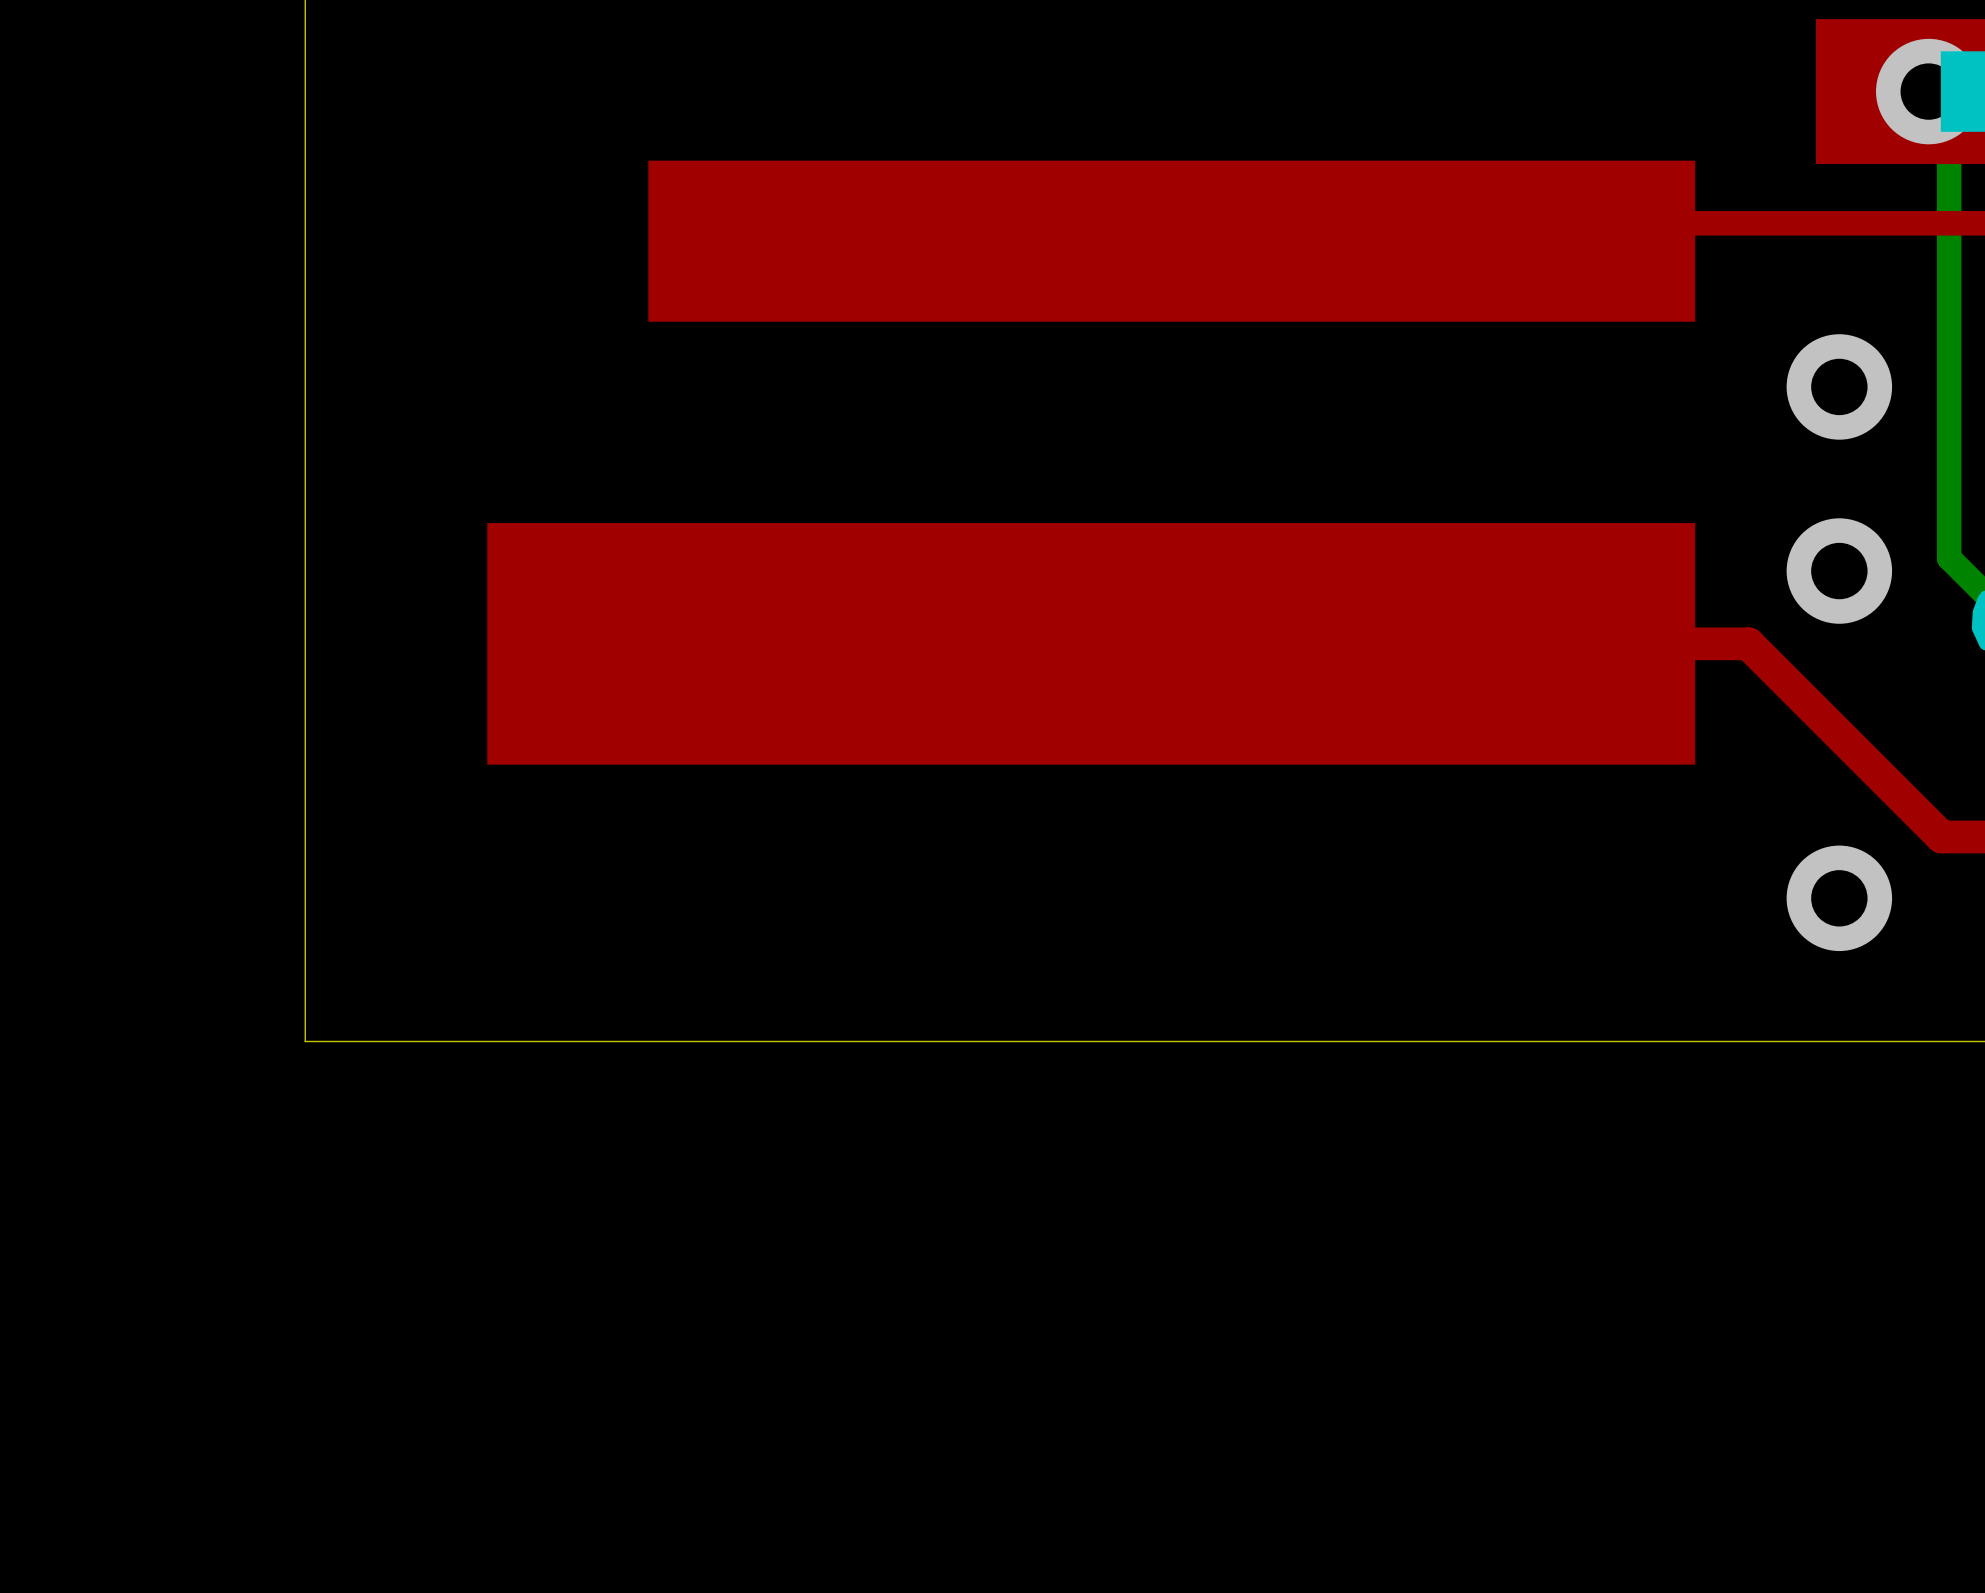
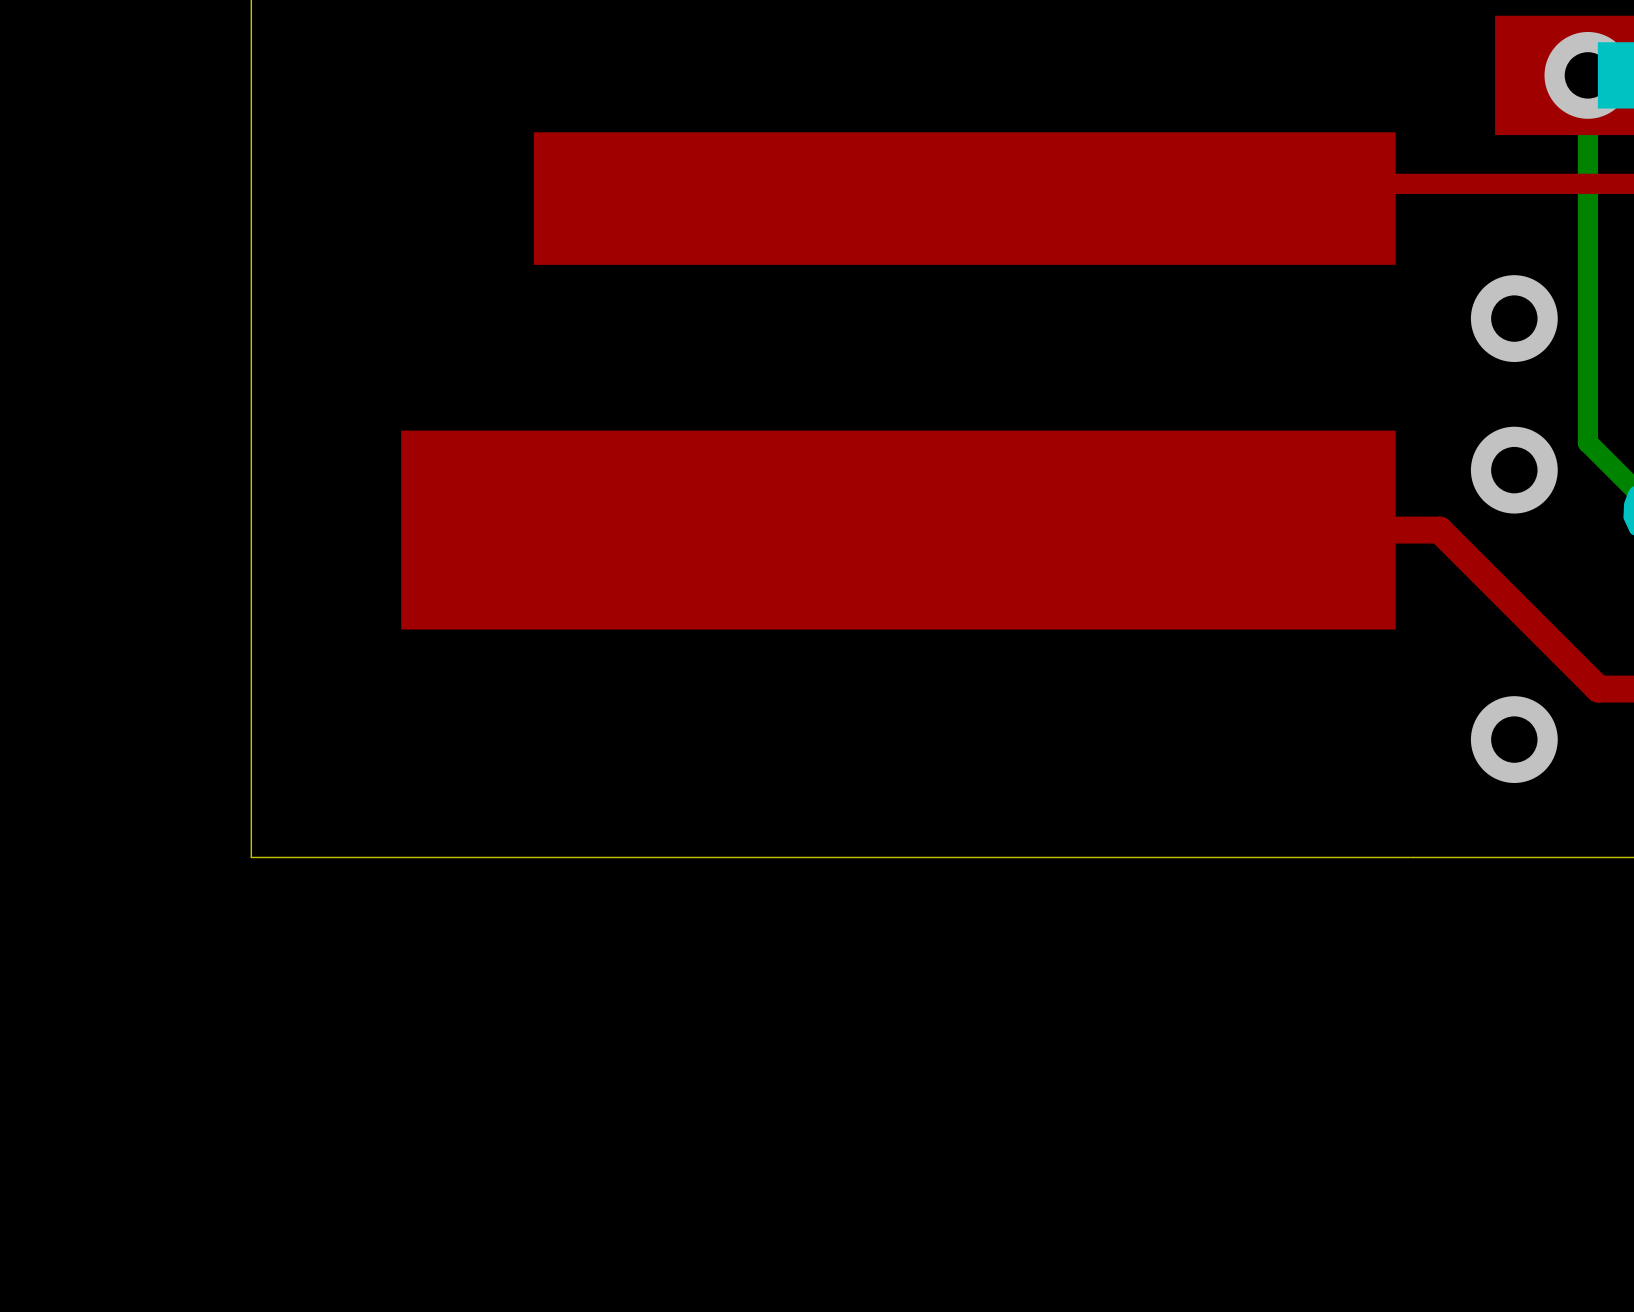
bottom track: (1928, 91) (1949, 112) (1949, 558) -> (1587, 75) (1587, 442) (1604, 459)

